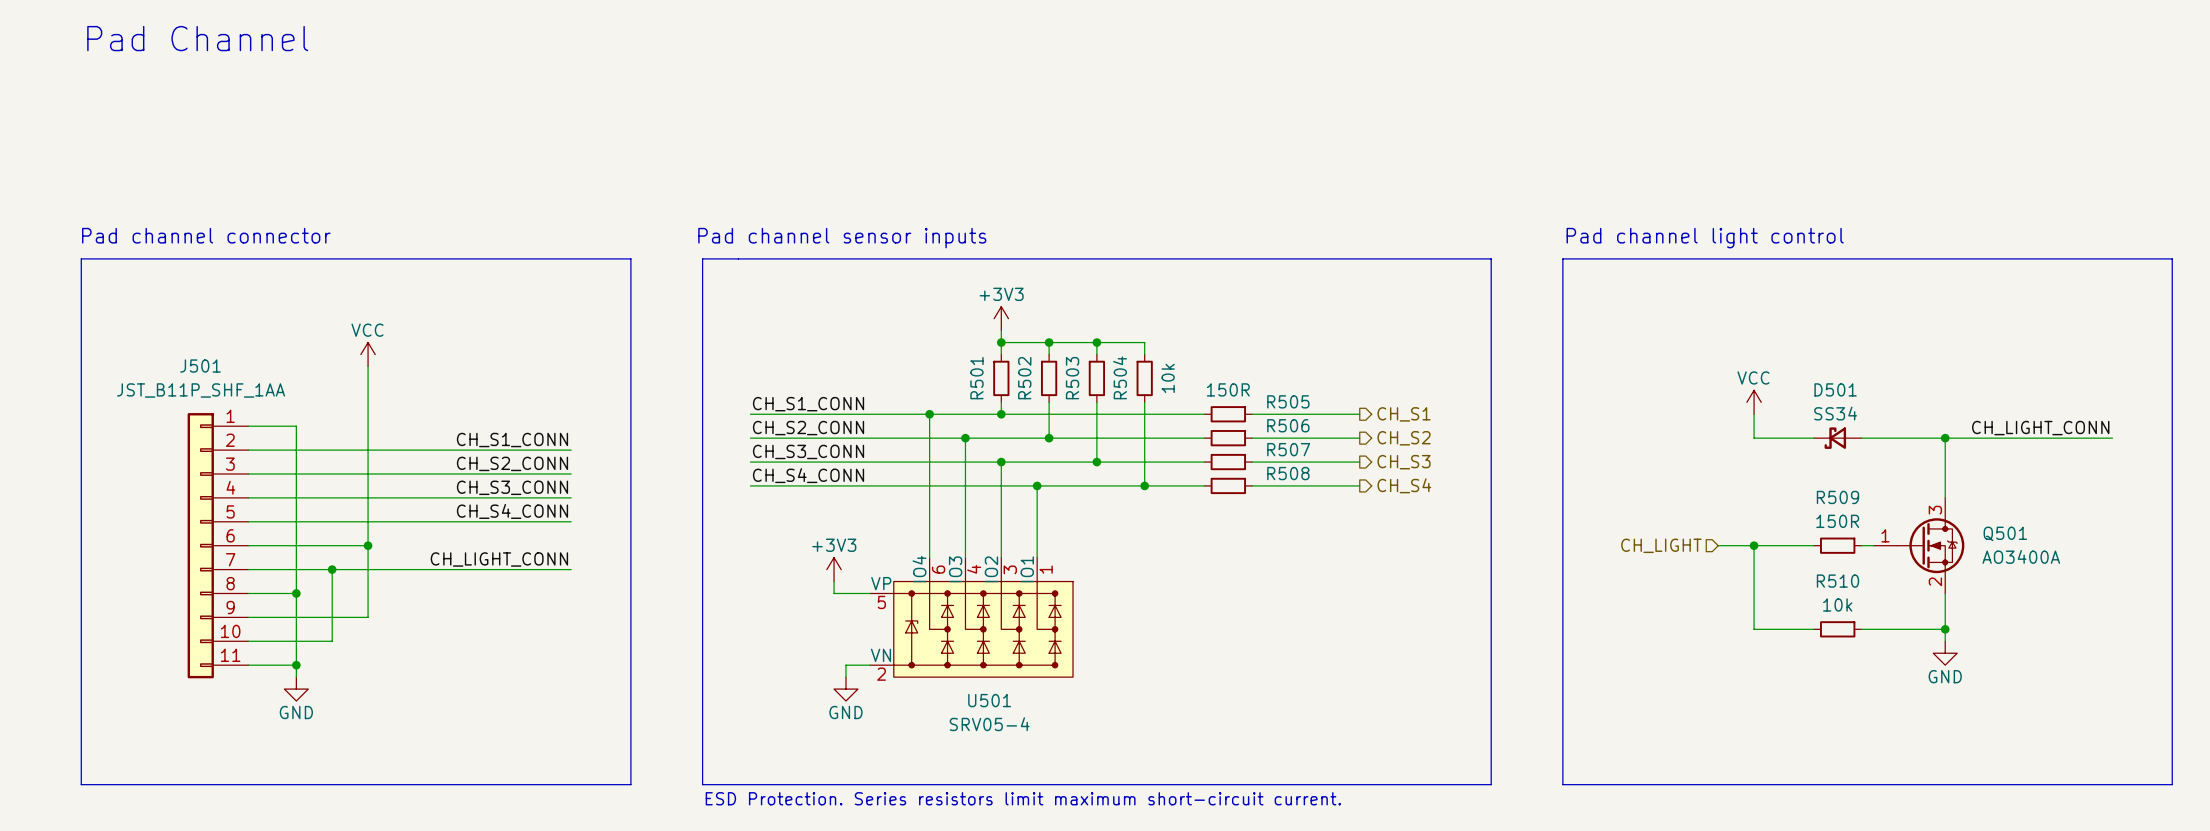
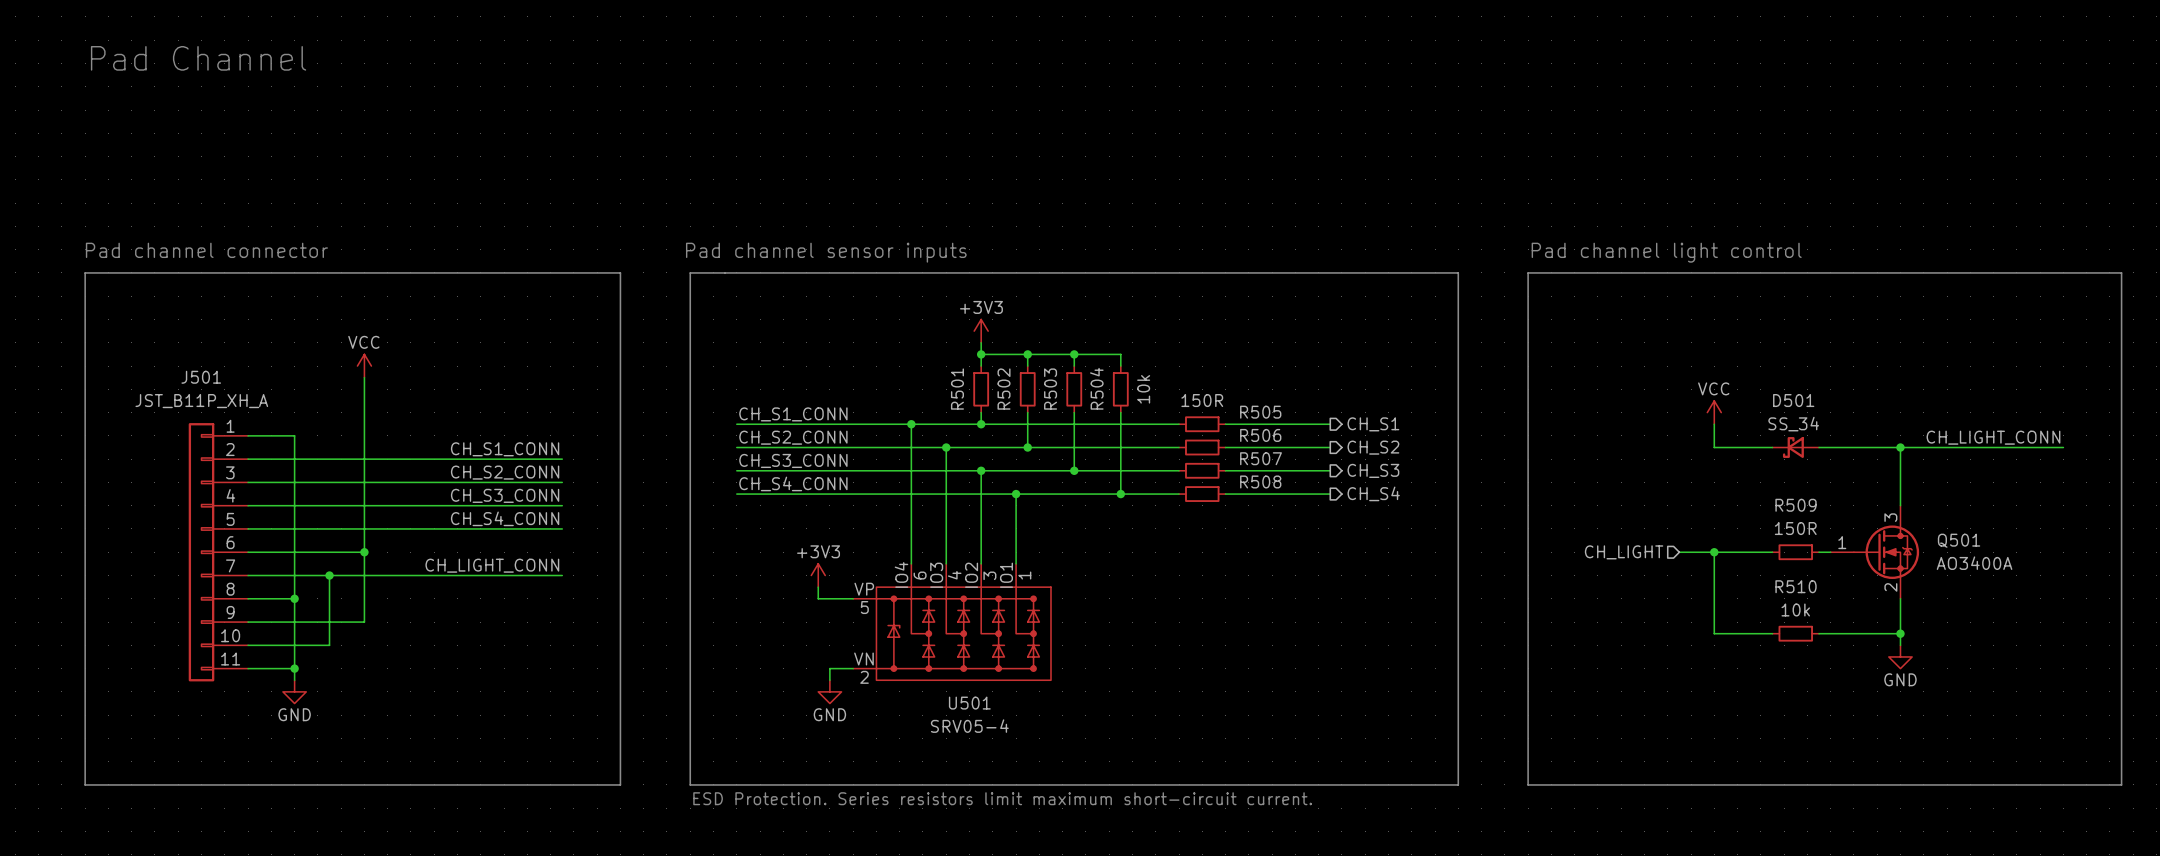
J501 value: JST_B11P_SHF_1AA (201, 390) -> JST_B11P_XH_A (201, 401)
D501 value: SS34 (1835, 413) -> SS_34 (1793, 424)

